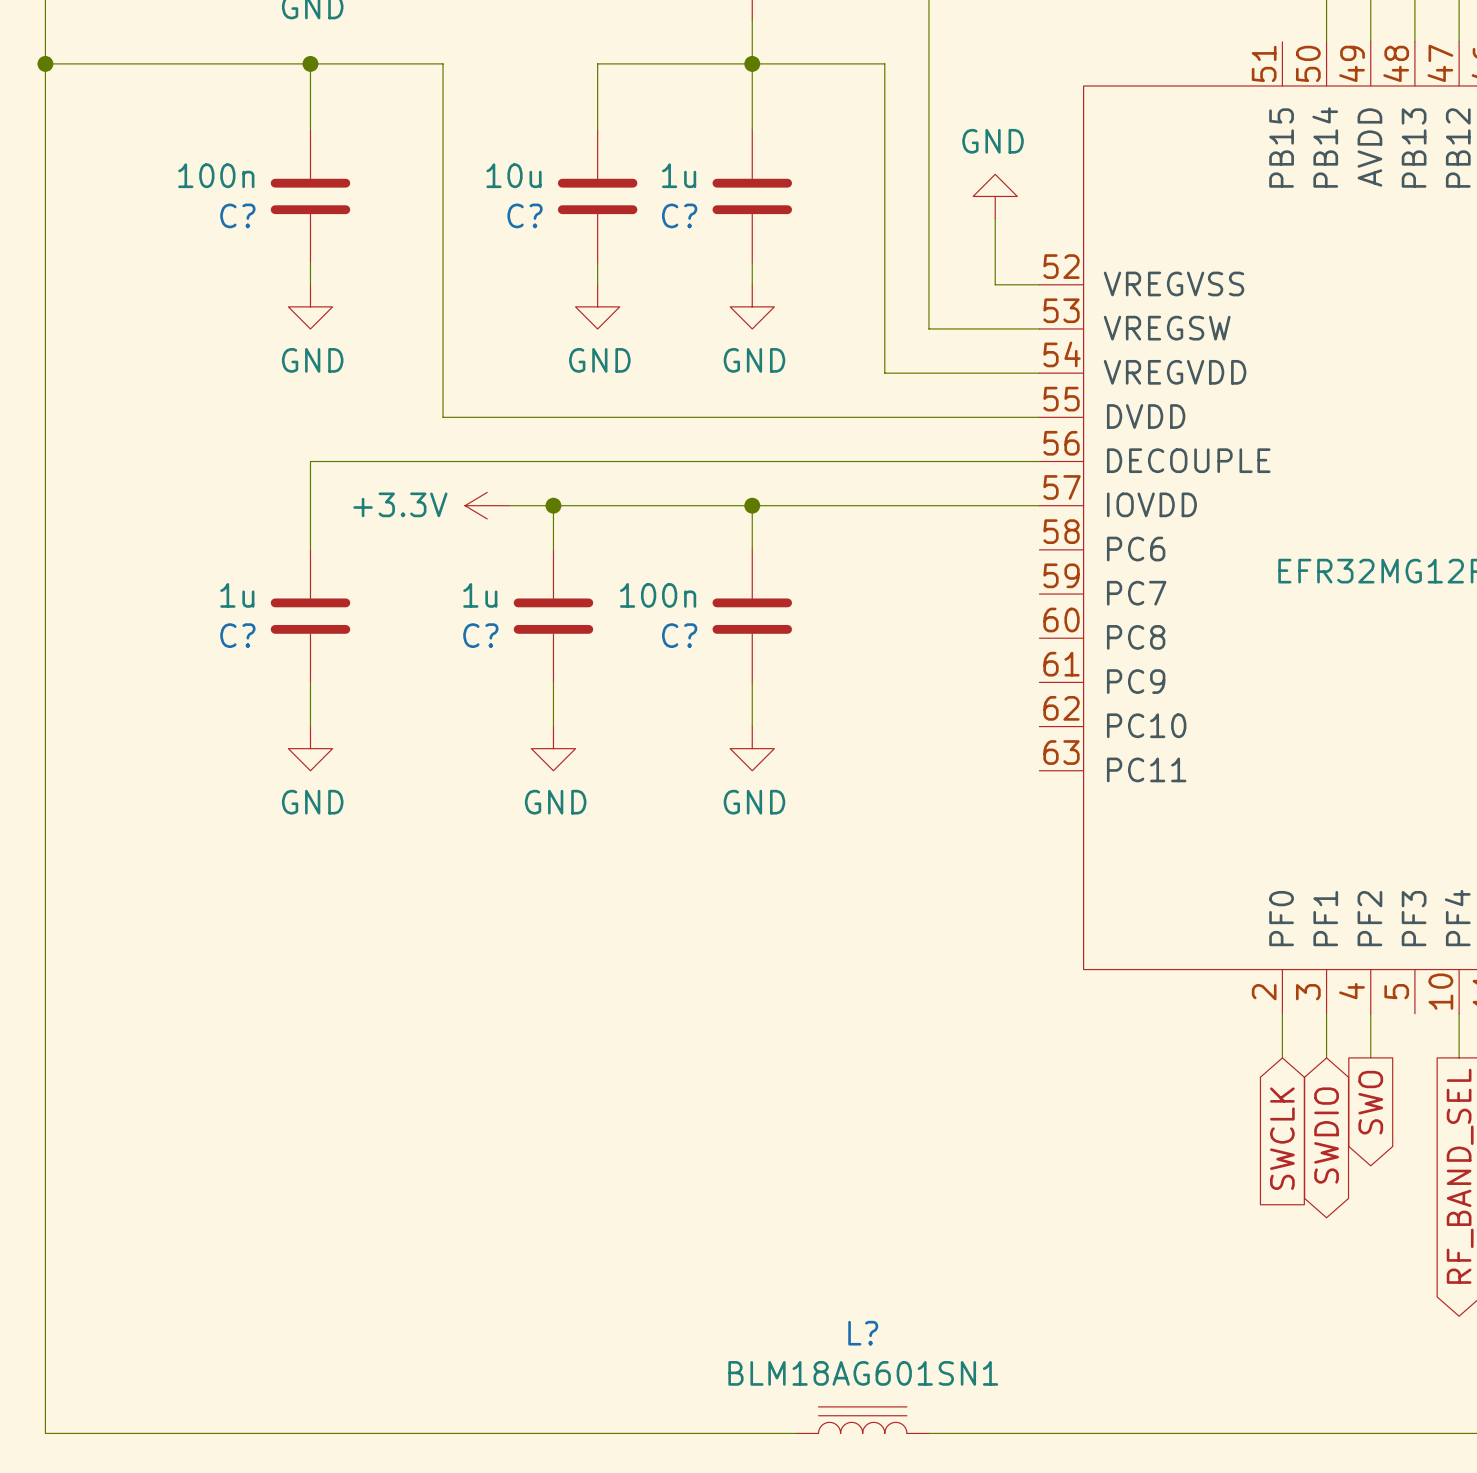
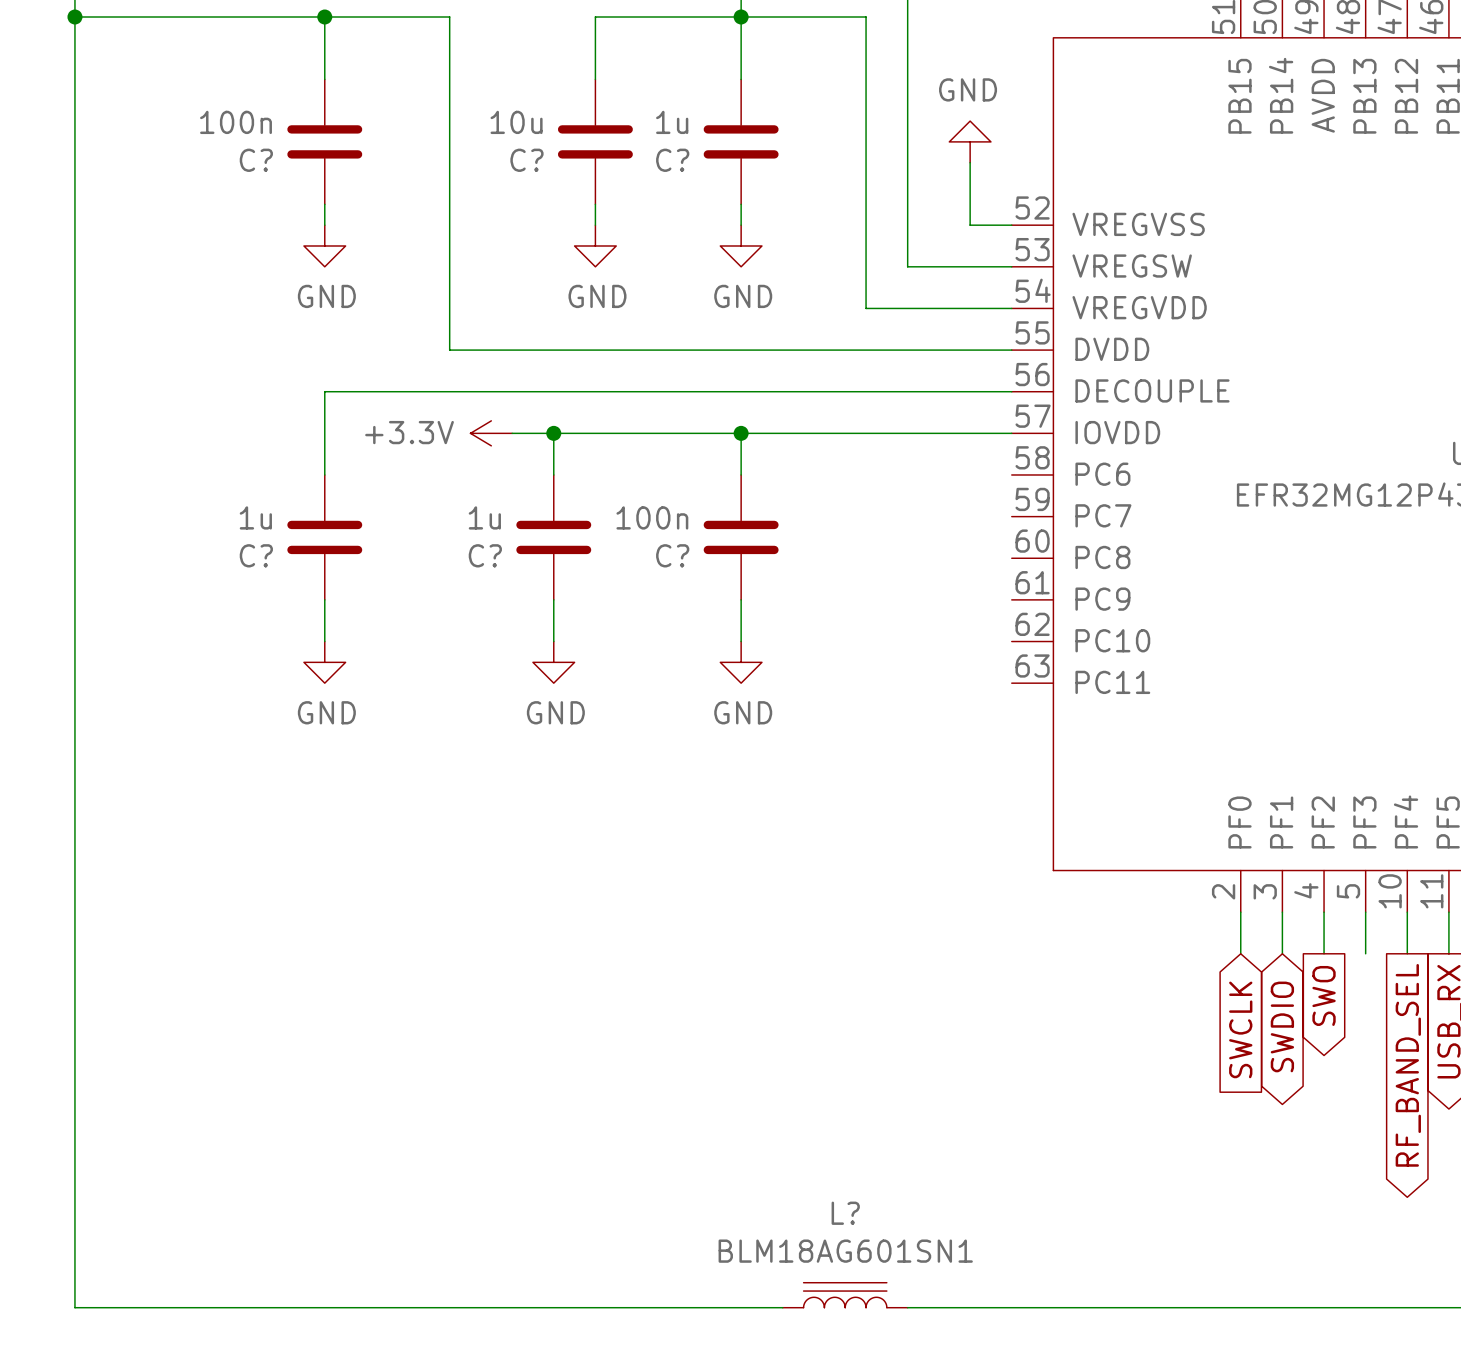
wire: none -> (1365, 912) (1365, 953)

